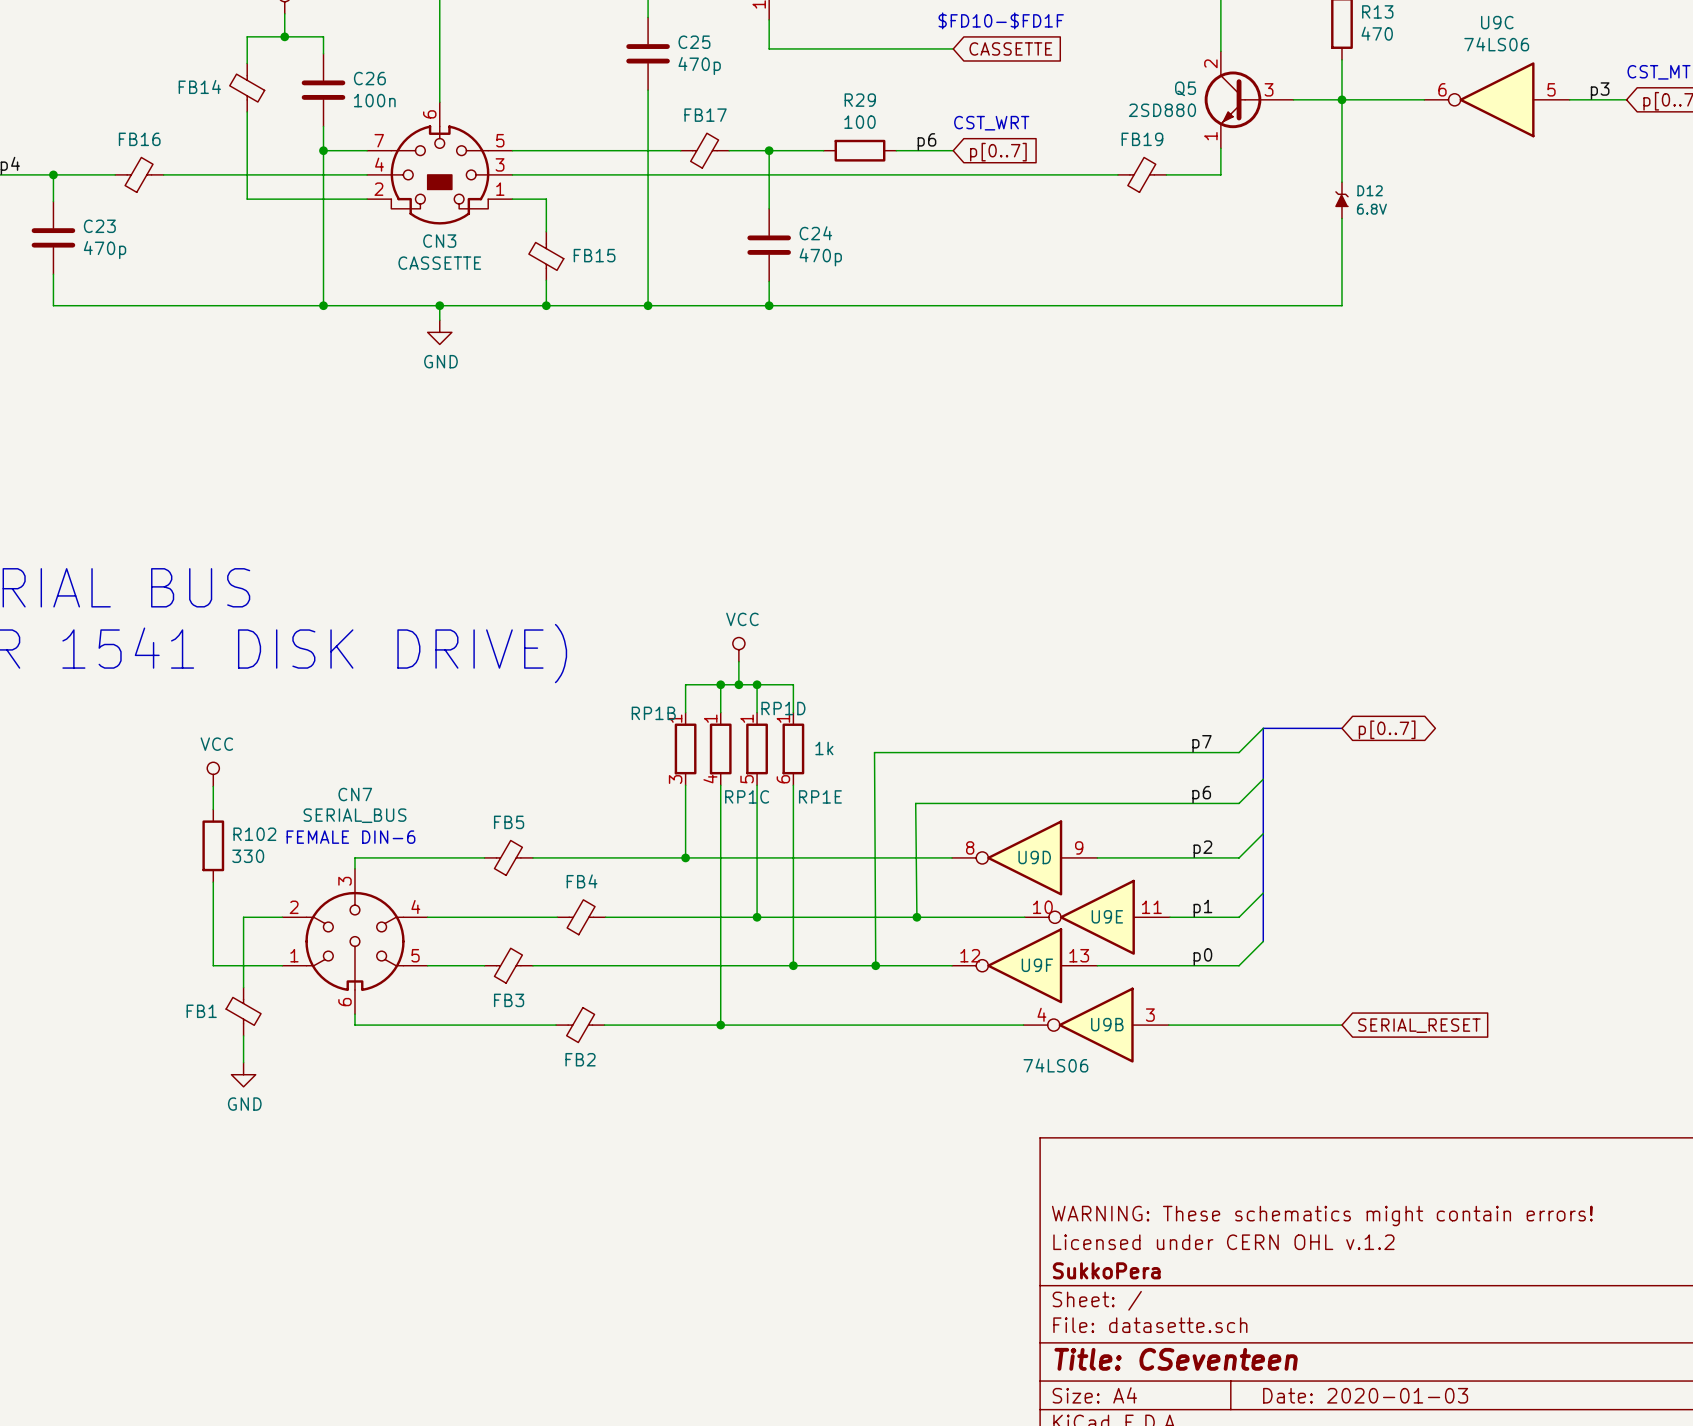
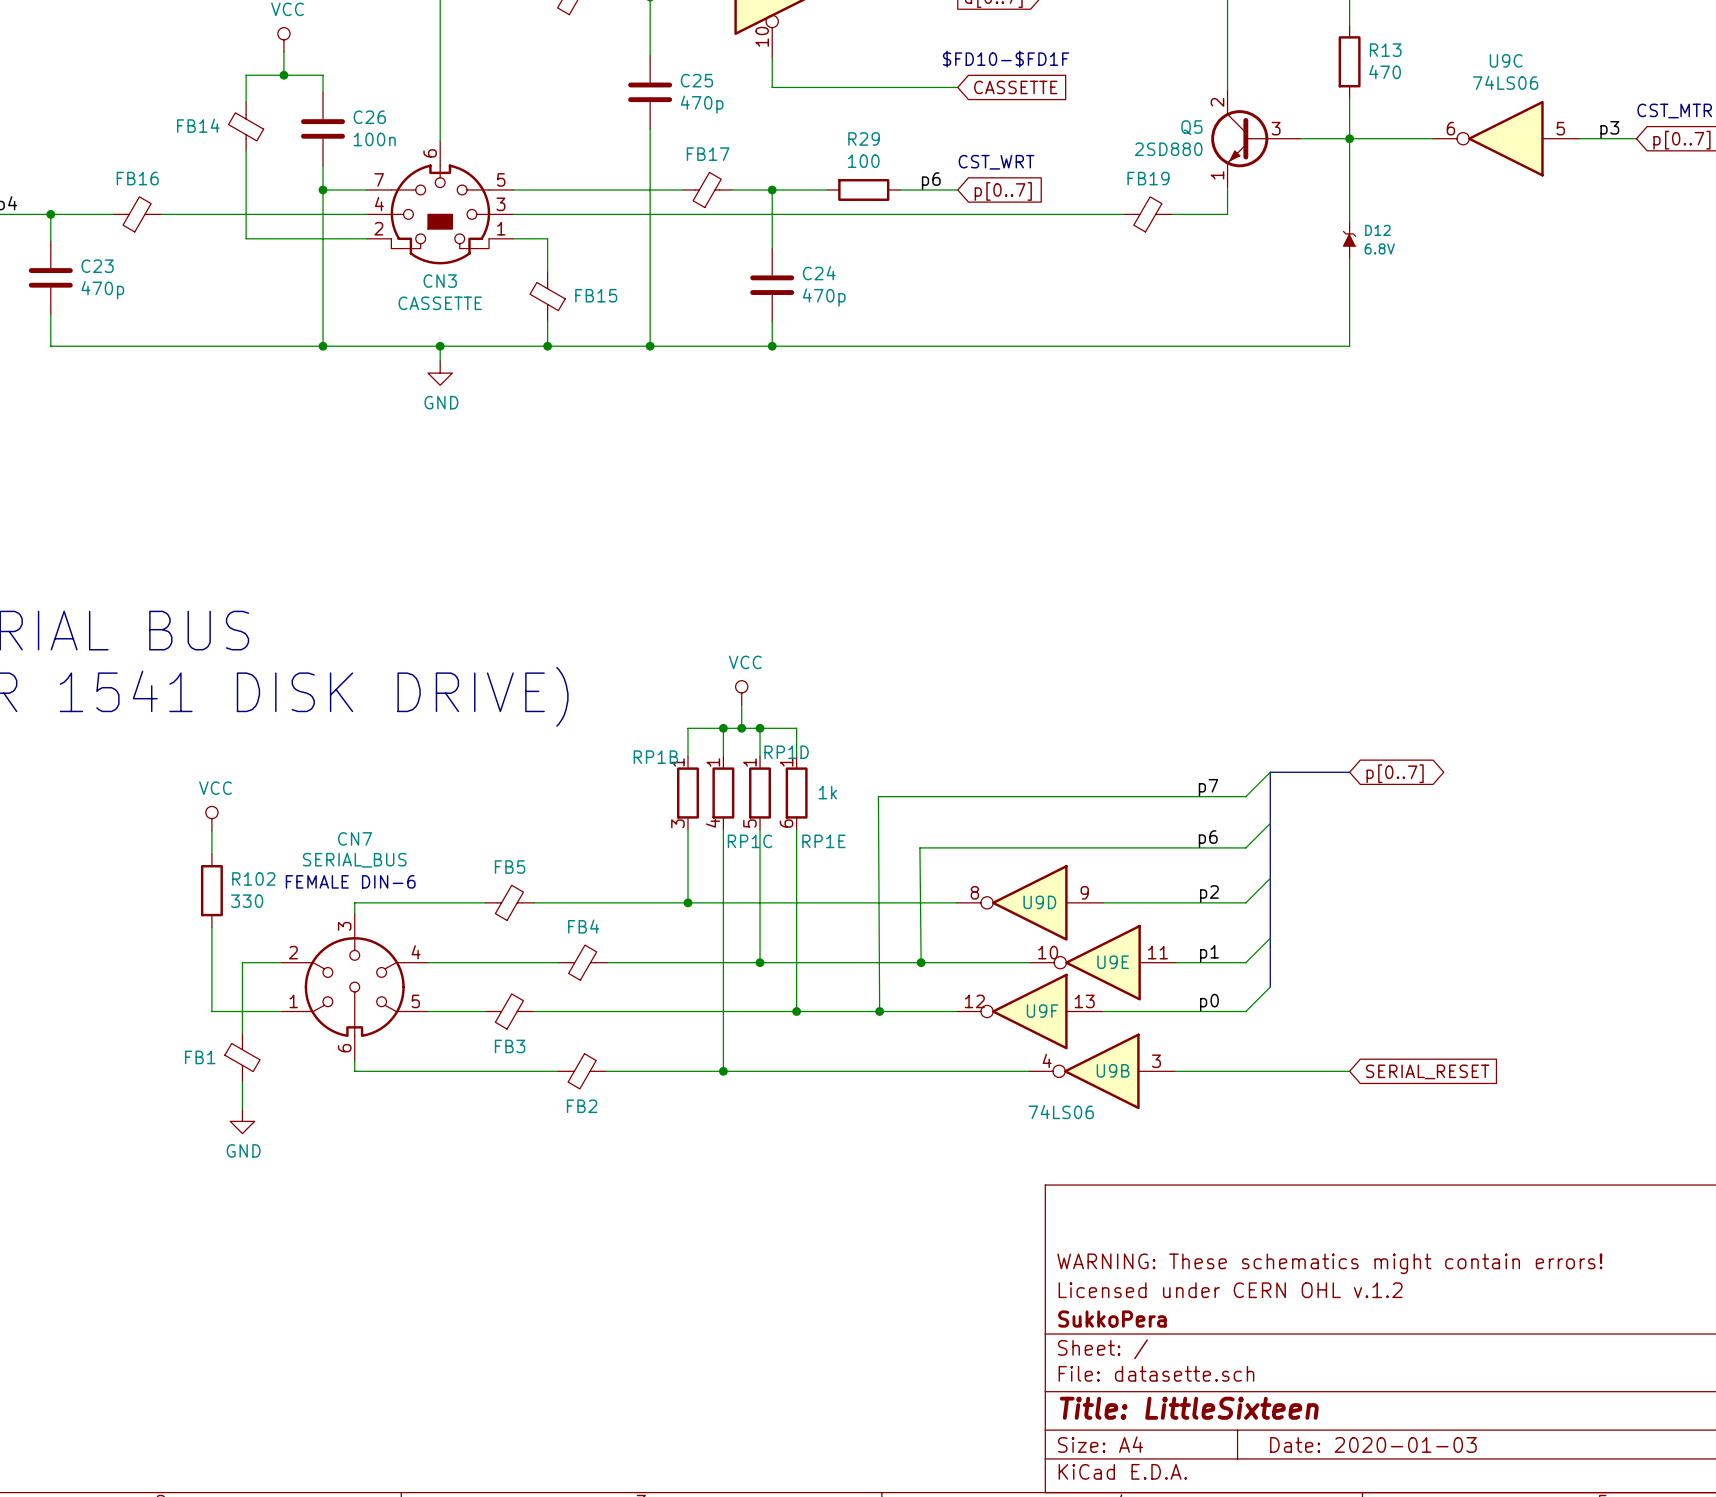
title block: Title: CSeventeen (1176, 1359) -> Title: LittleSixteen (1189, 1408)

